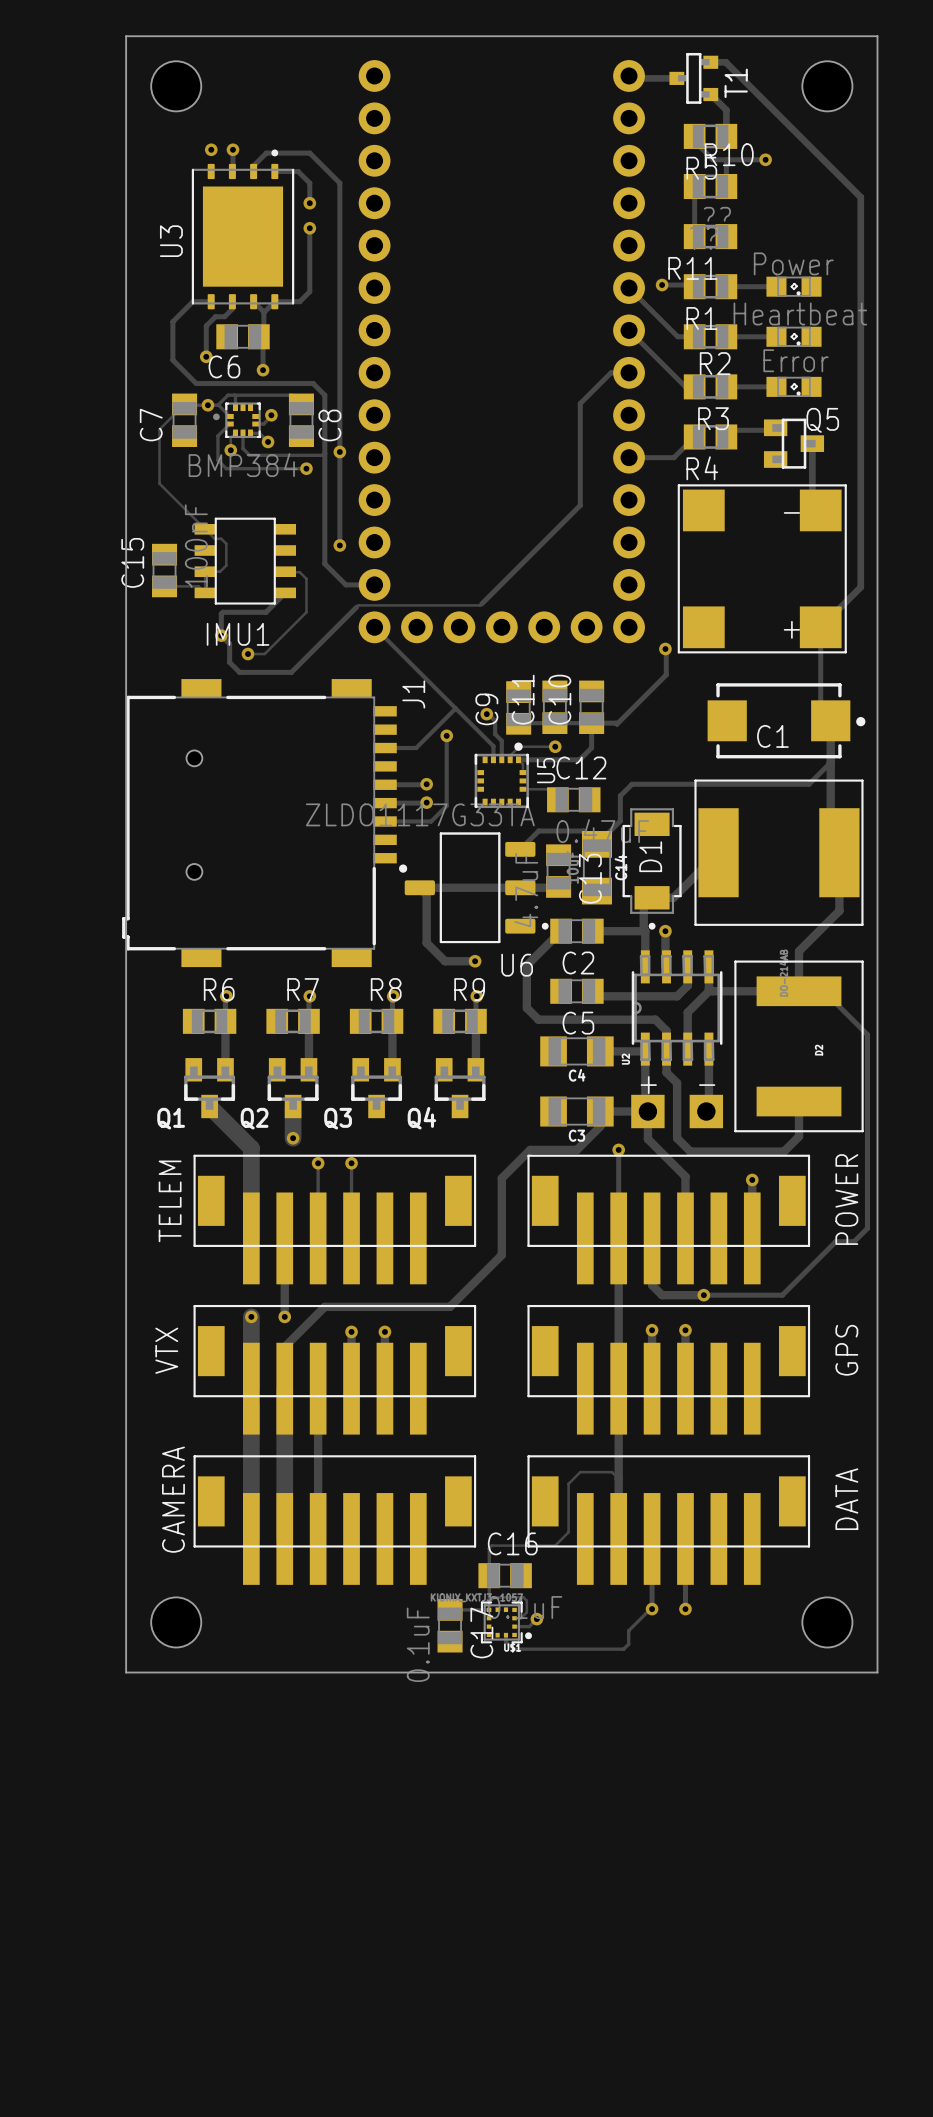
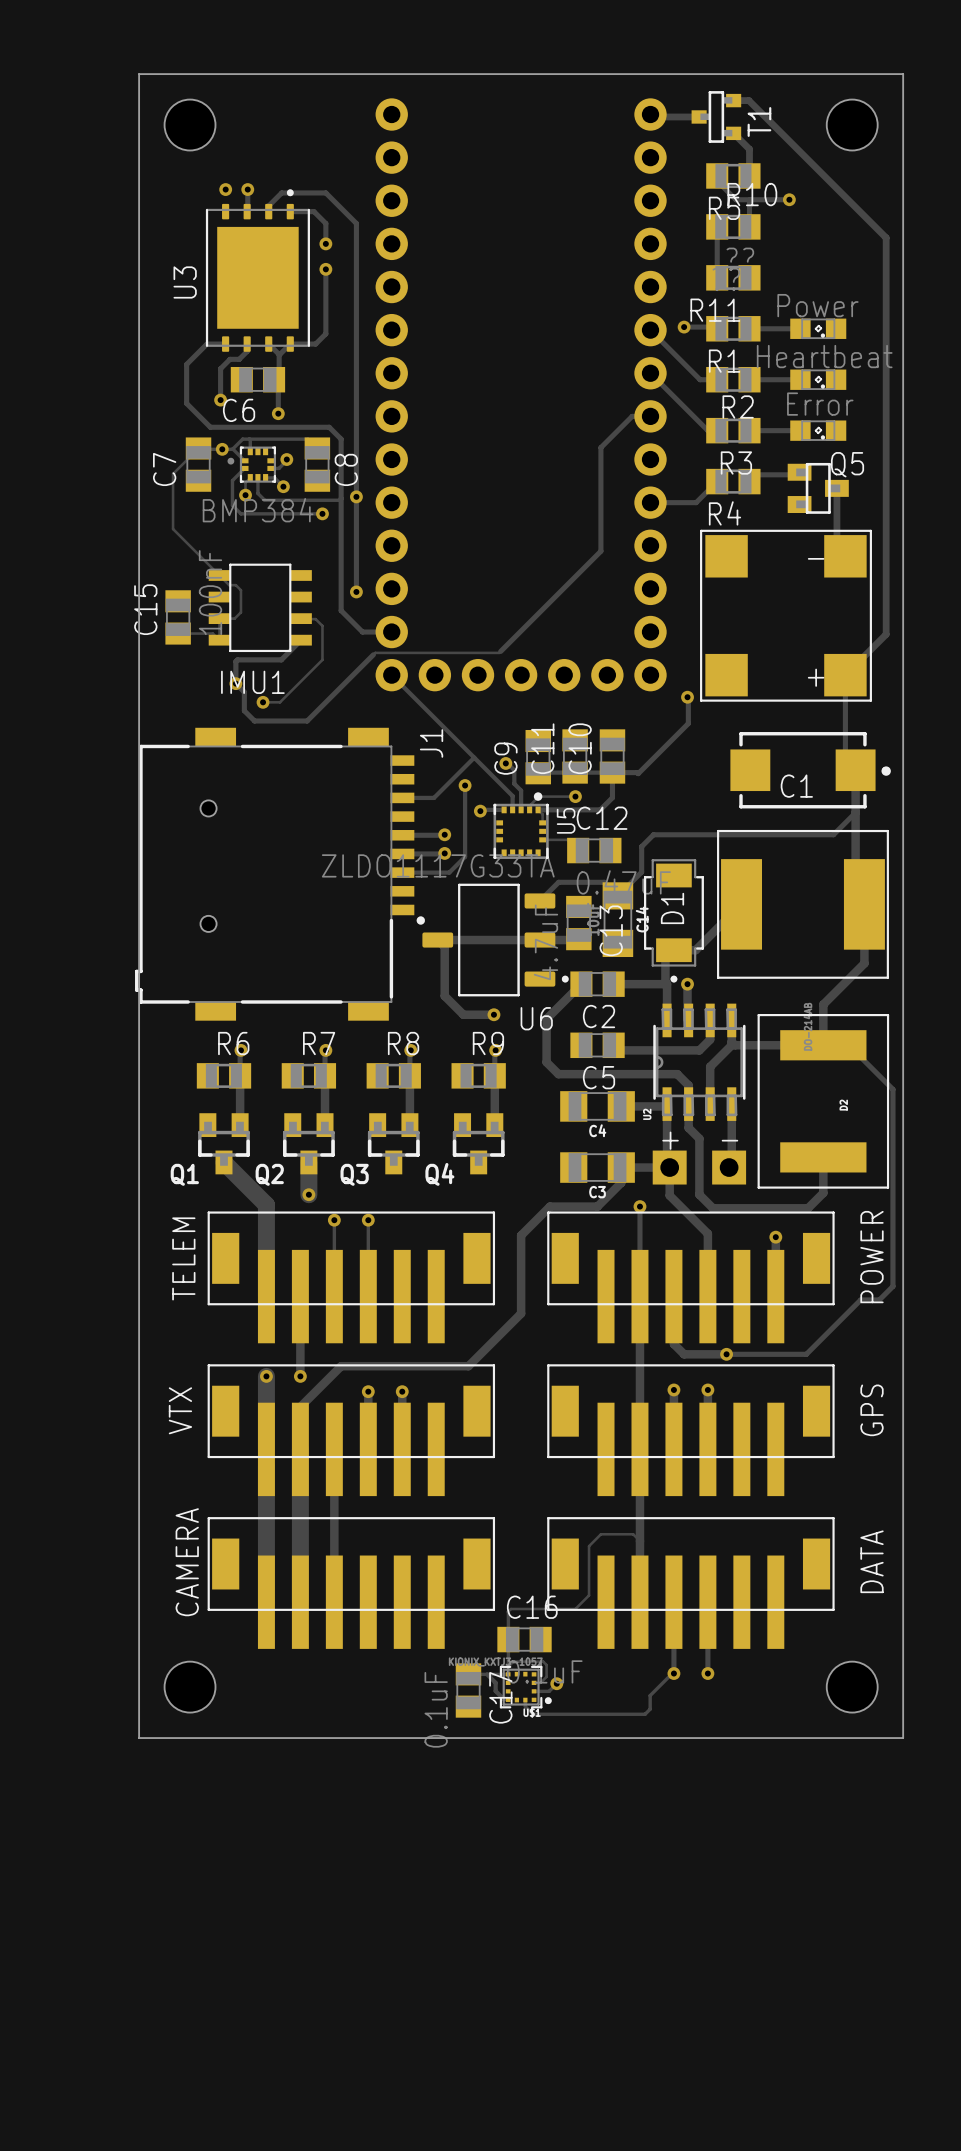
track: none -> (504, 809) (480, 811)
via: none -> (480, 811)
track: none -> (487, 1674) (495, 1682) (495, 1691) (503, 1698) (508, 1699)

